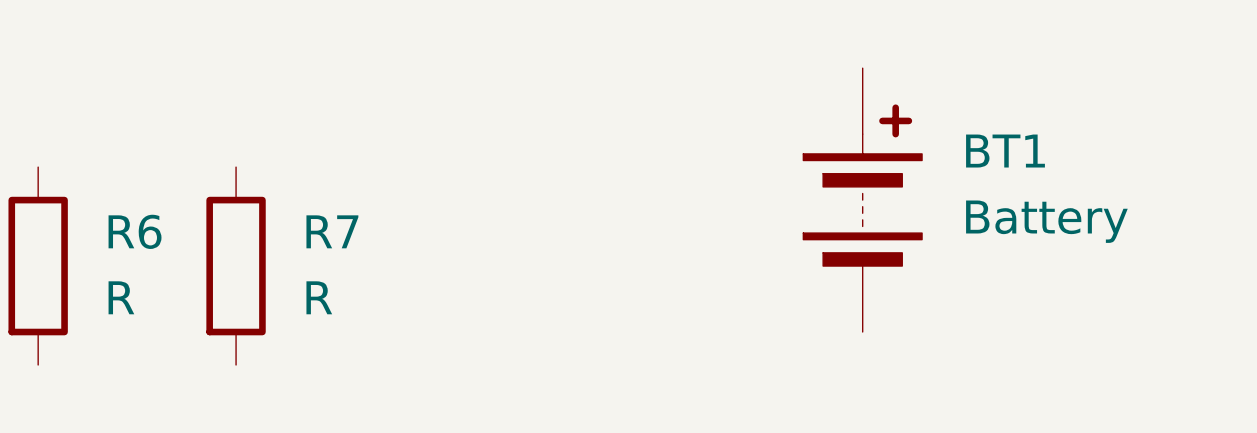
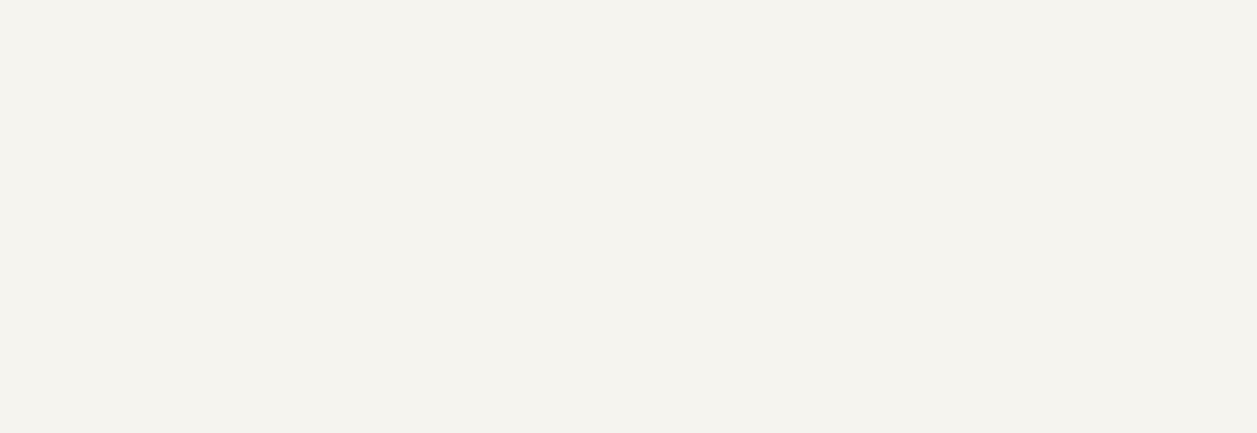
BT1: Battery (862, 200) -> none
R6: R (38, 266) -> none
R7: R (236, 266) -> none

